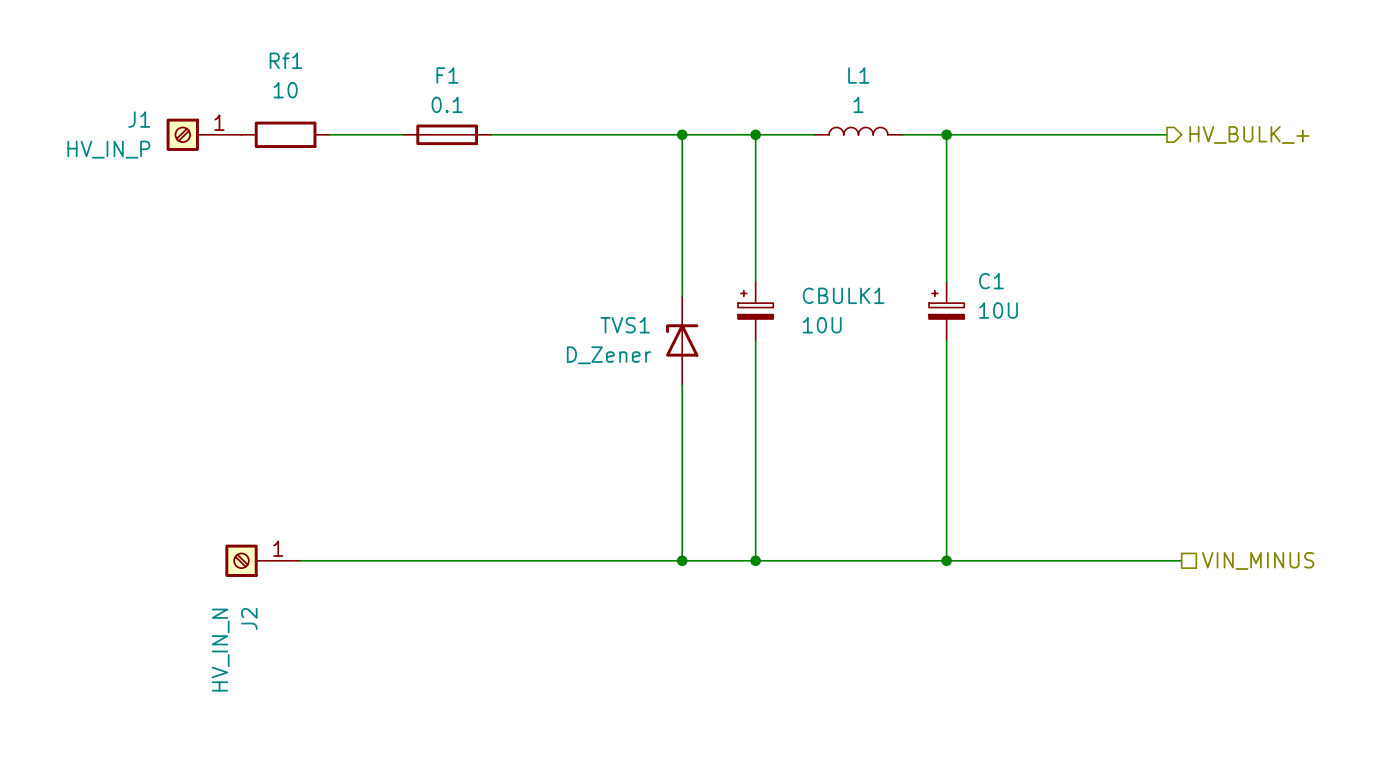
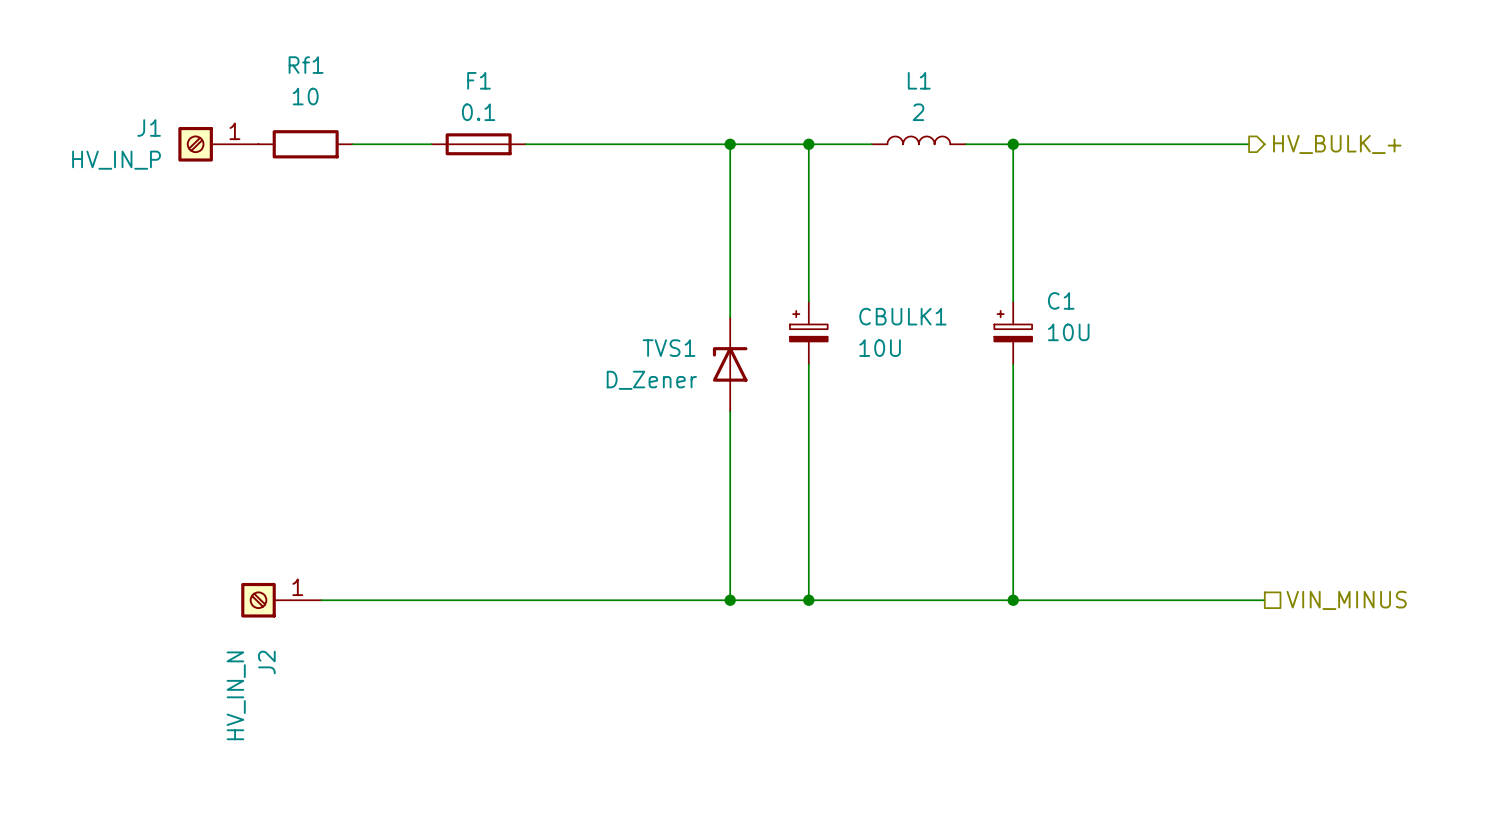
L1 value: 1 (858, 104) -> 2 (918, 112)

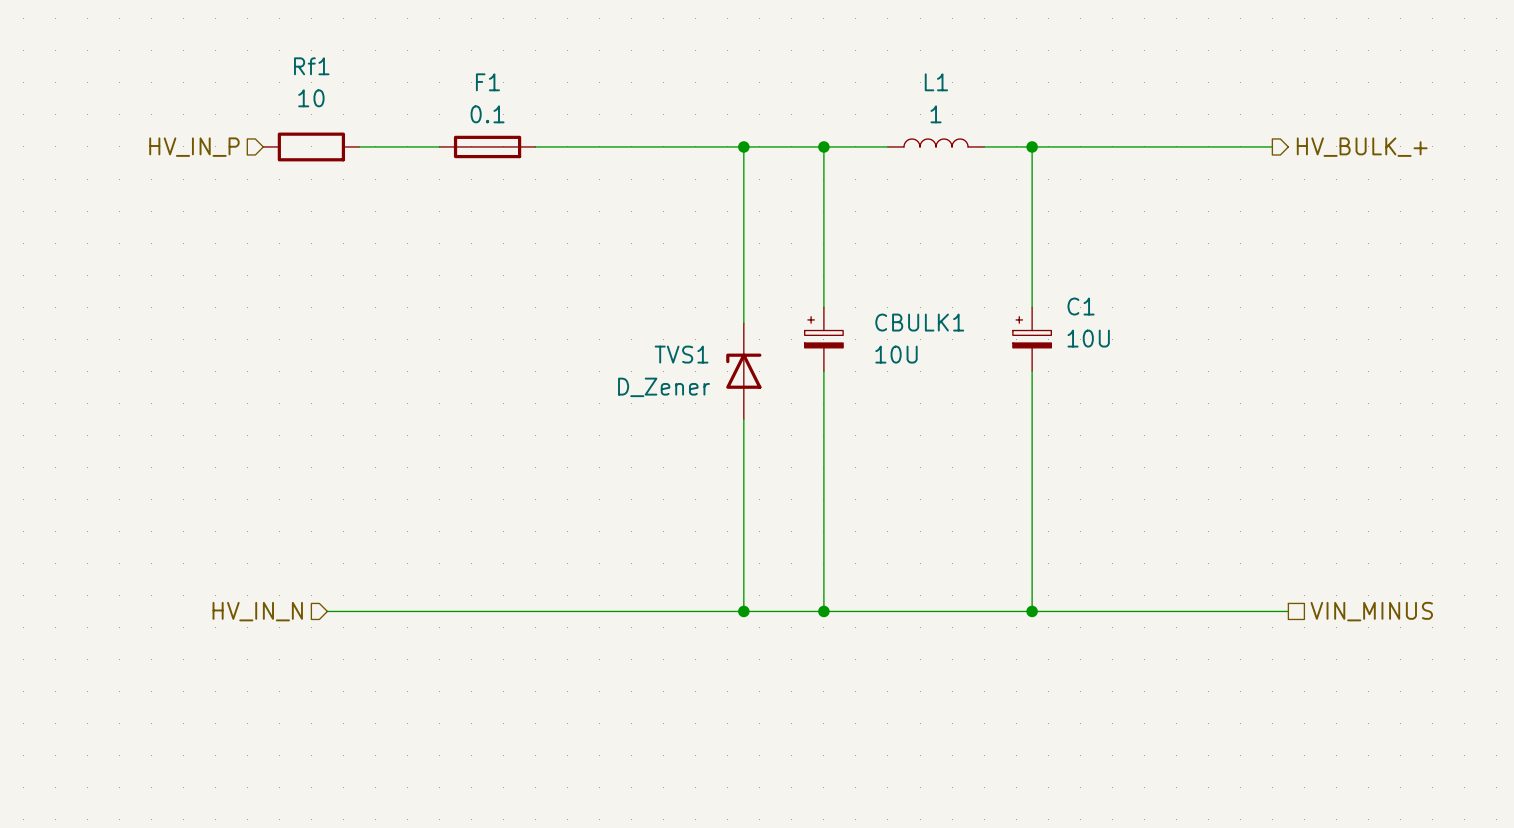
L1 value: 2 (918, 112) -> 1 (936, 114)
hierarchical label: none -> HV_IN_P (194, 147)
J1: HV_IN_P (218, 144) -> none
hierarchical label: none -> HV_IN_N (257, 611)
J2: HV_IN_N (281, 600) -> none

